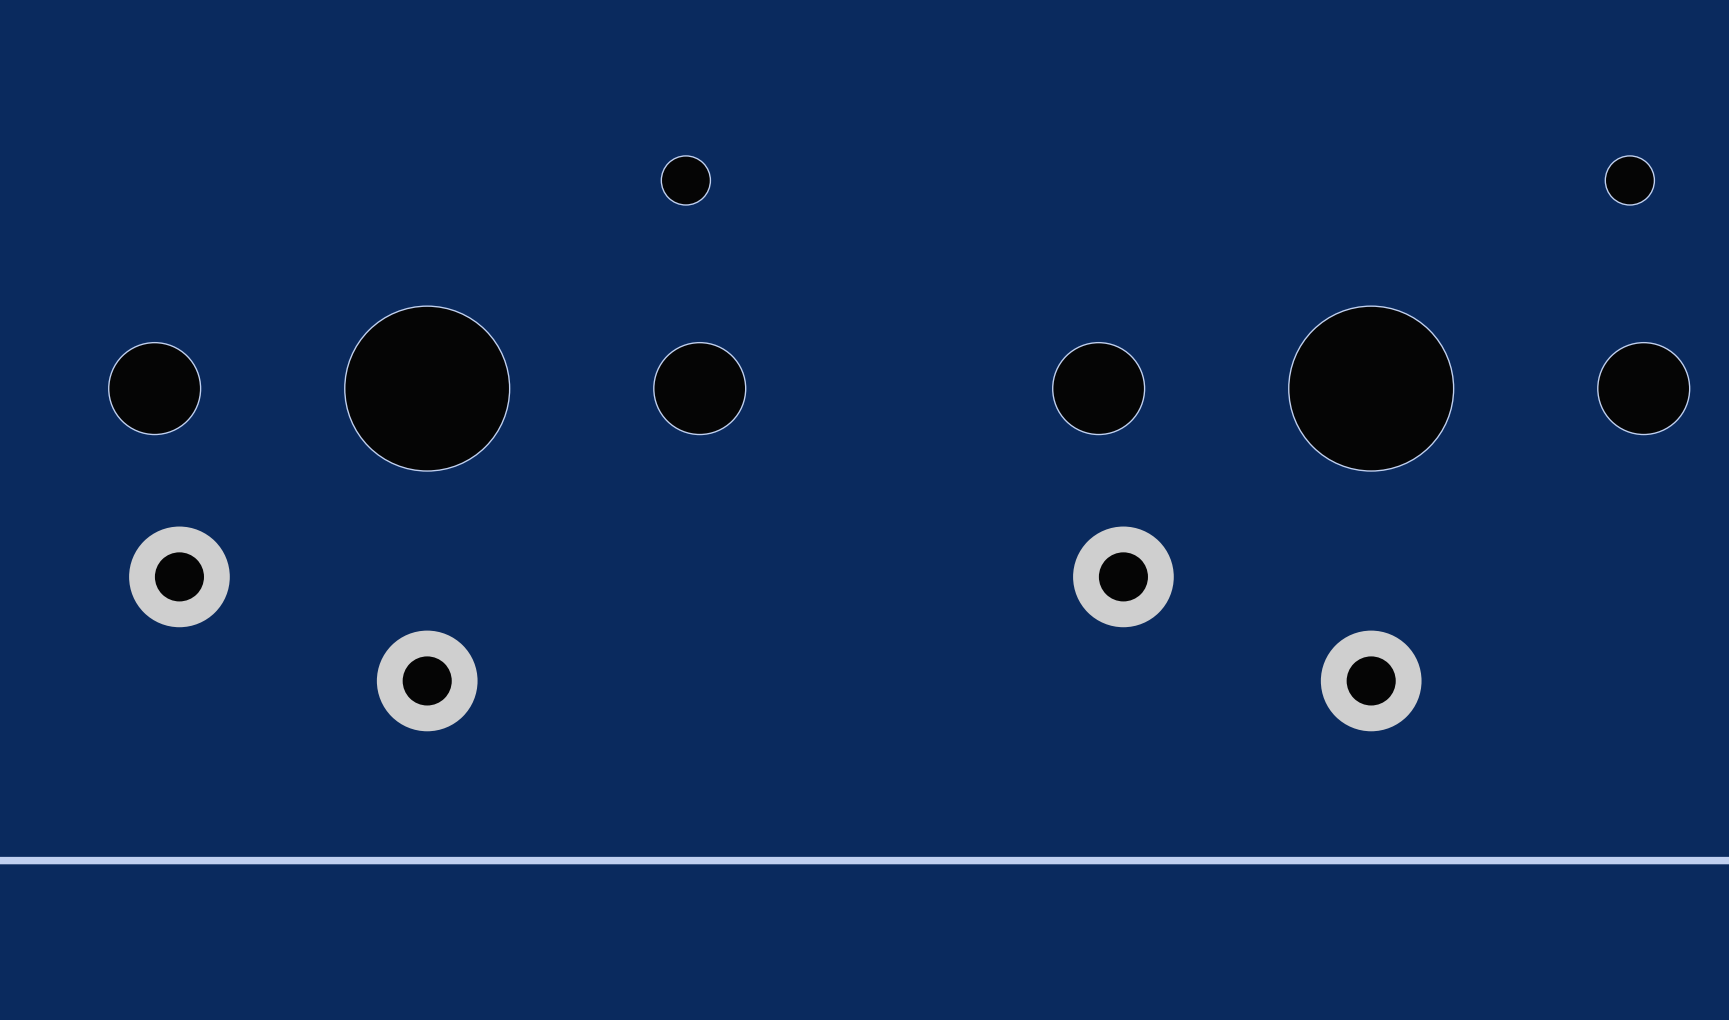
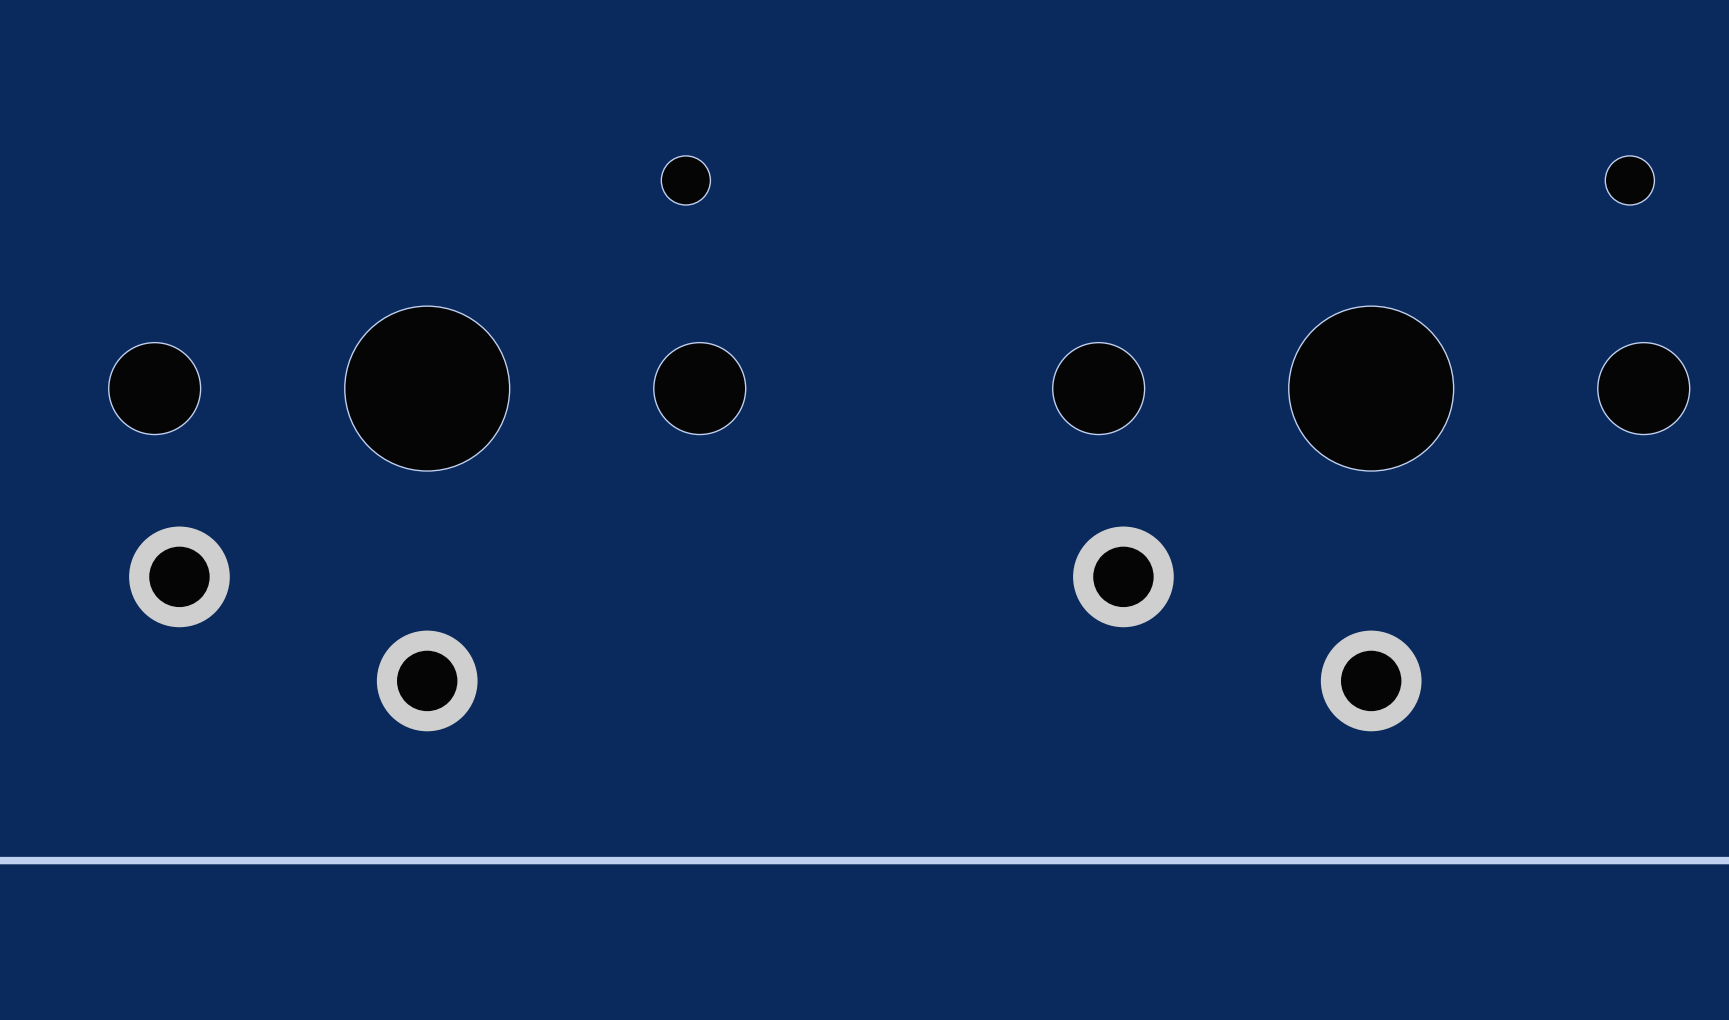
part footprint: [108, 155, 746, 732] -> [108, 155, 746, 732]
part footprint: [1052, 155, 1690, 732] -> [1052, 155, 1690, 732]

